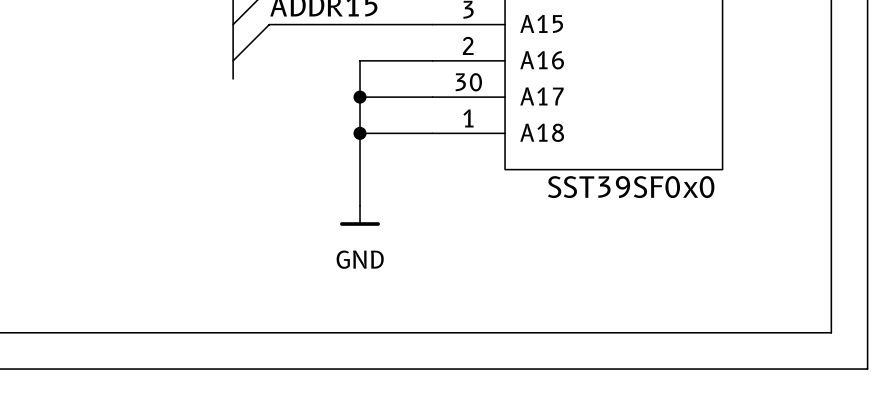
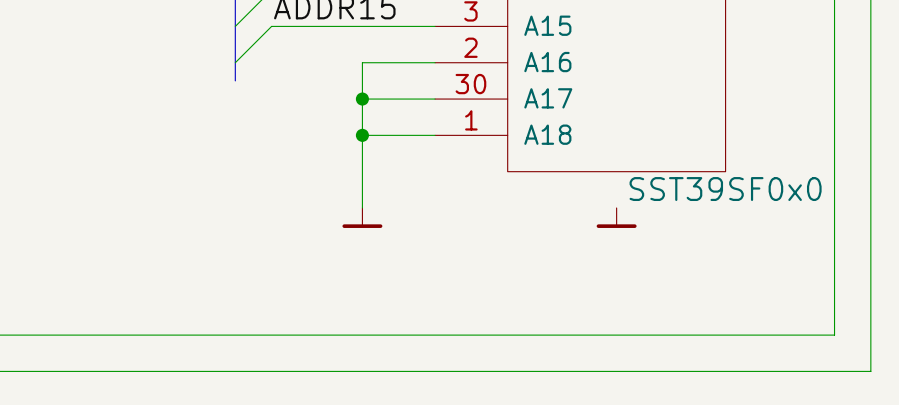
part value position: SST39SF0x0 (631, 187) -> SST39SF0x0 (725, 189)
power symbol: none -> (616, 217)
power symbol text: GND (360, 259) -> none

